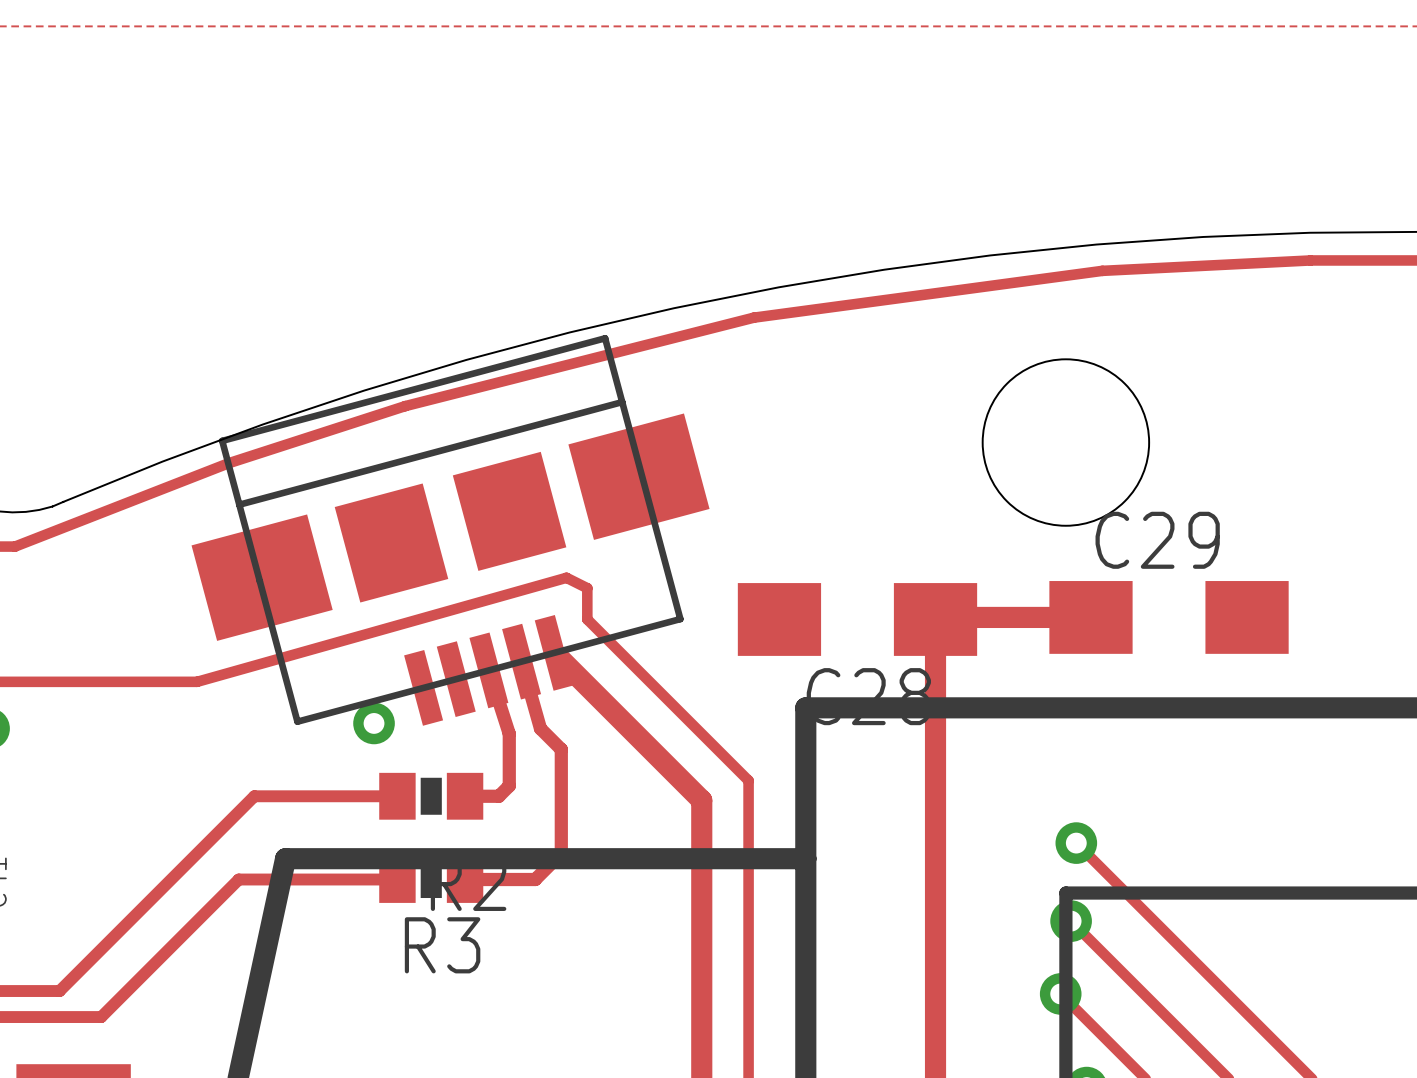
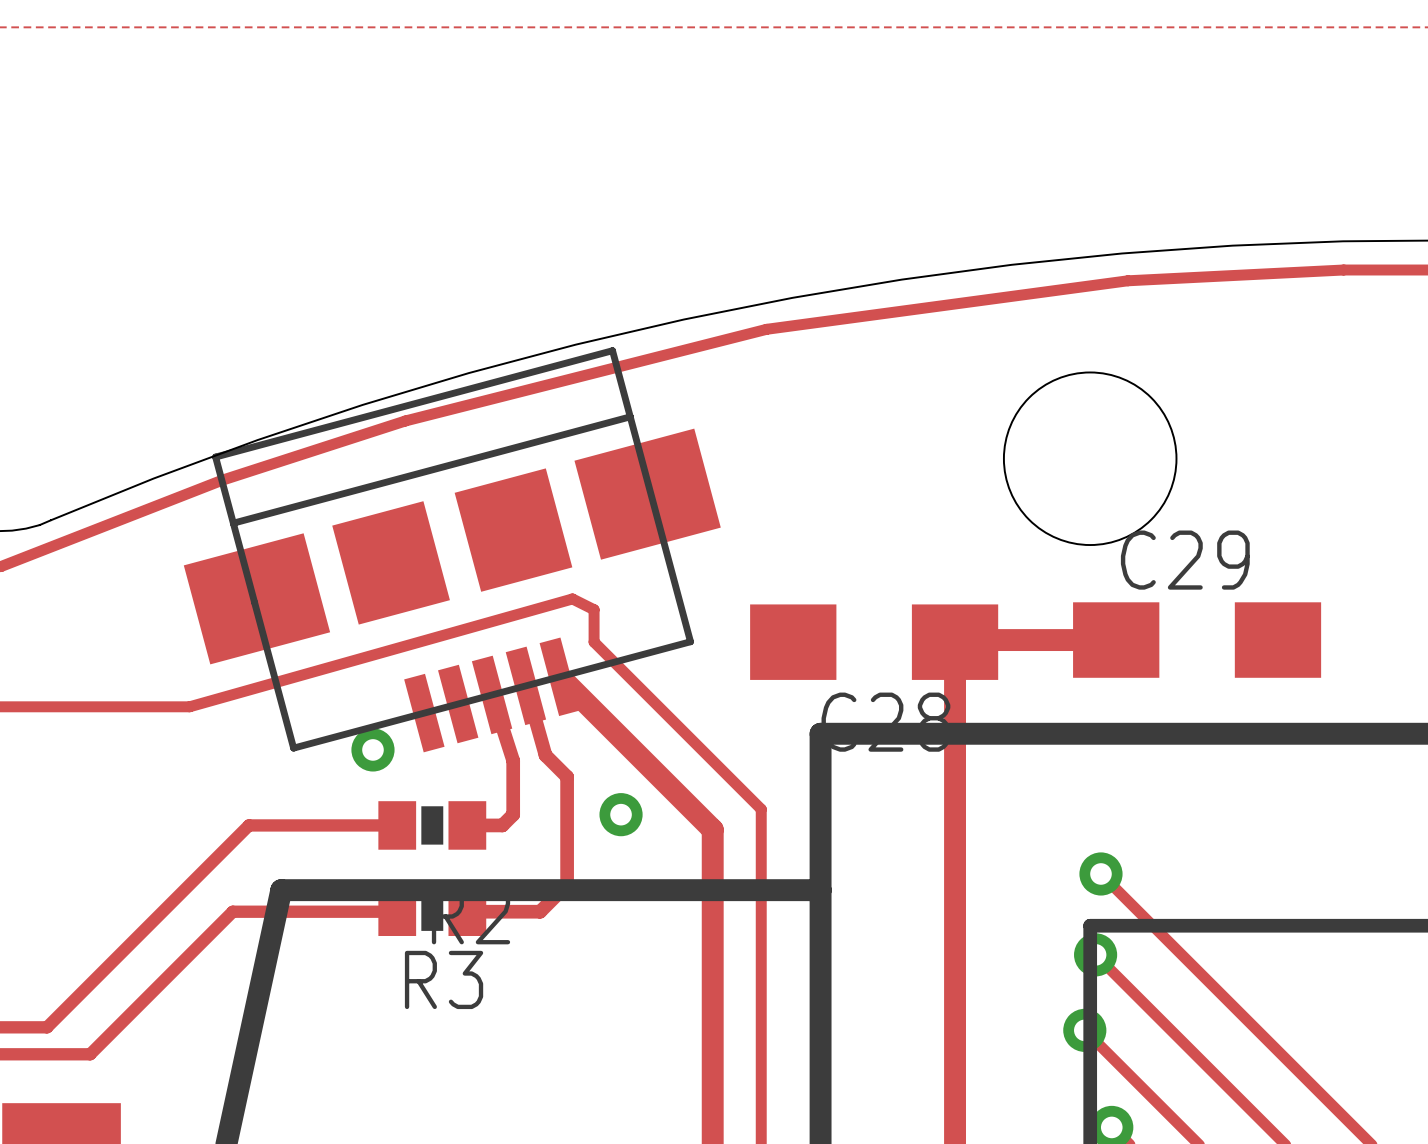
via: none -> (621, 814)

